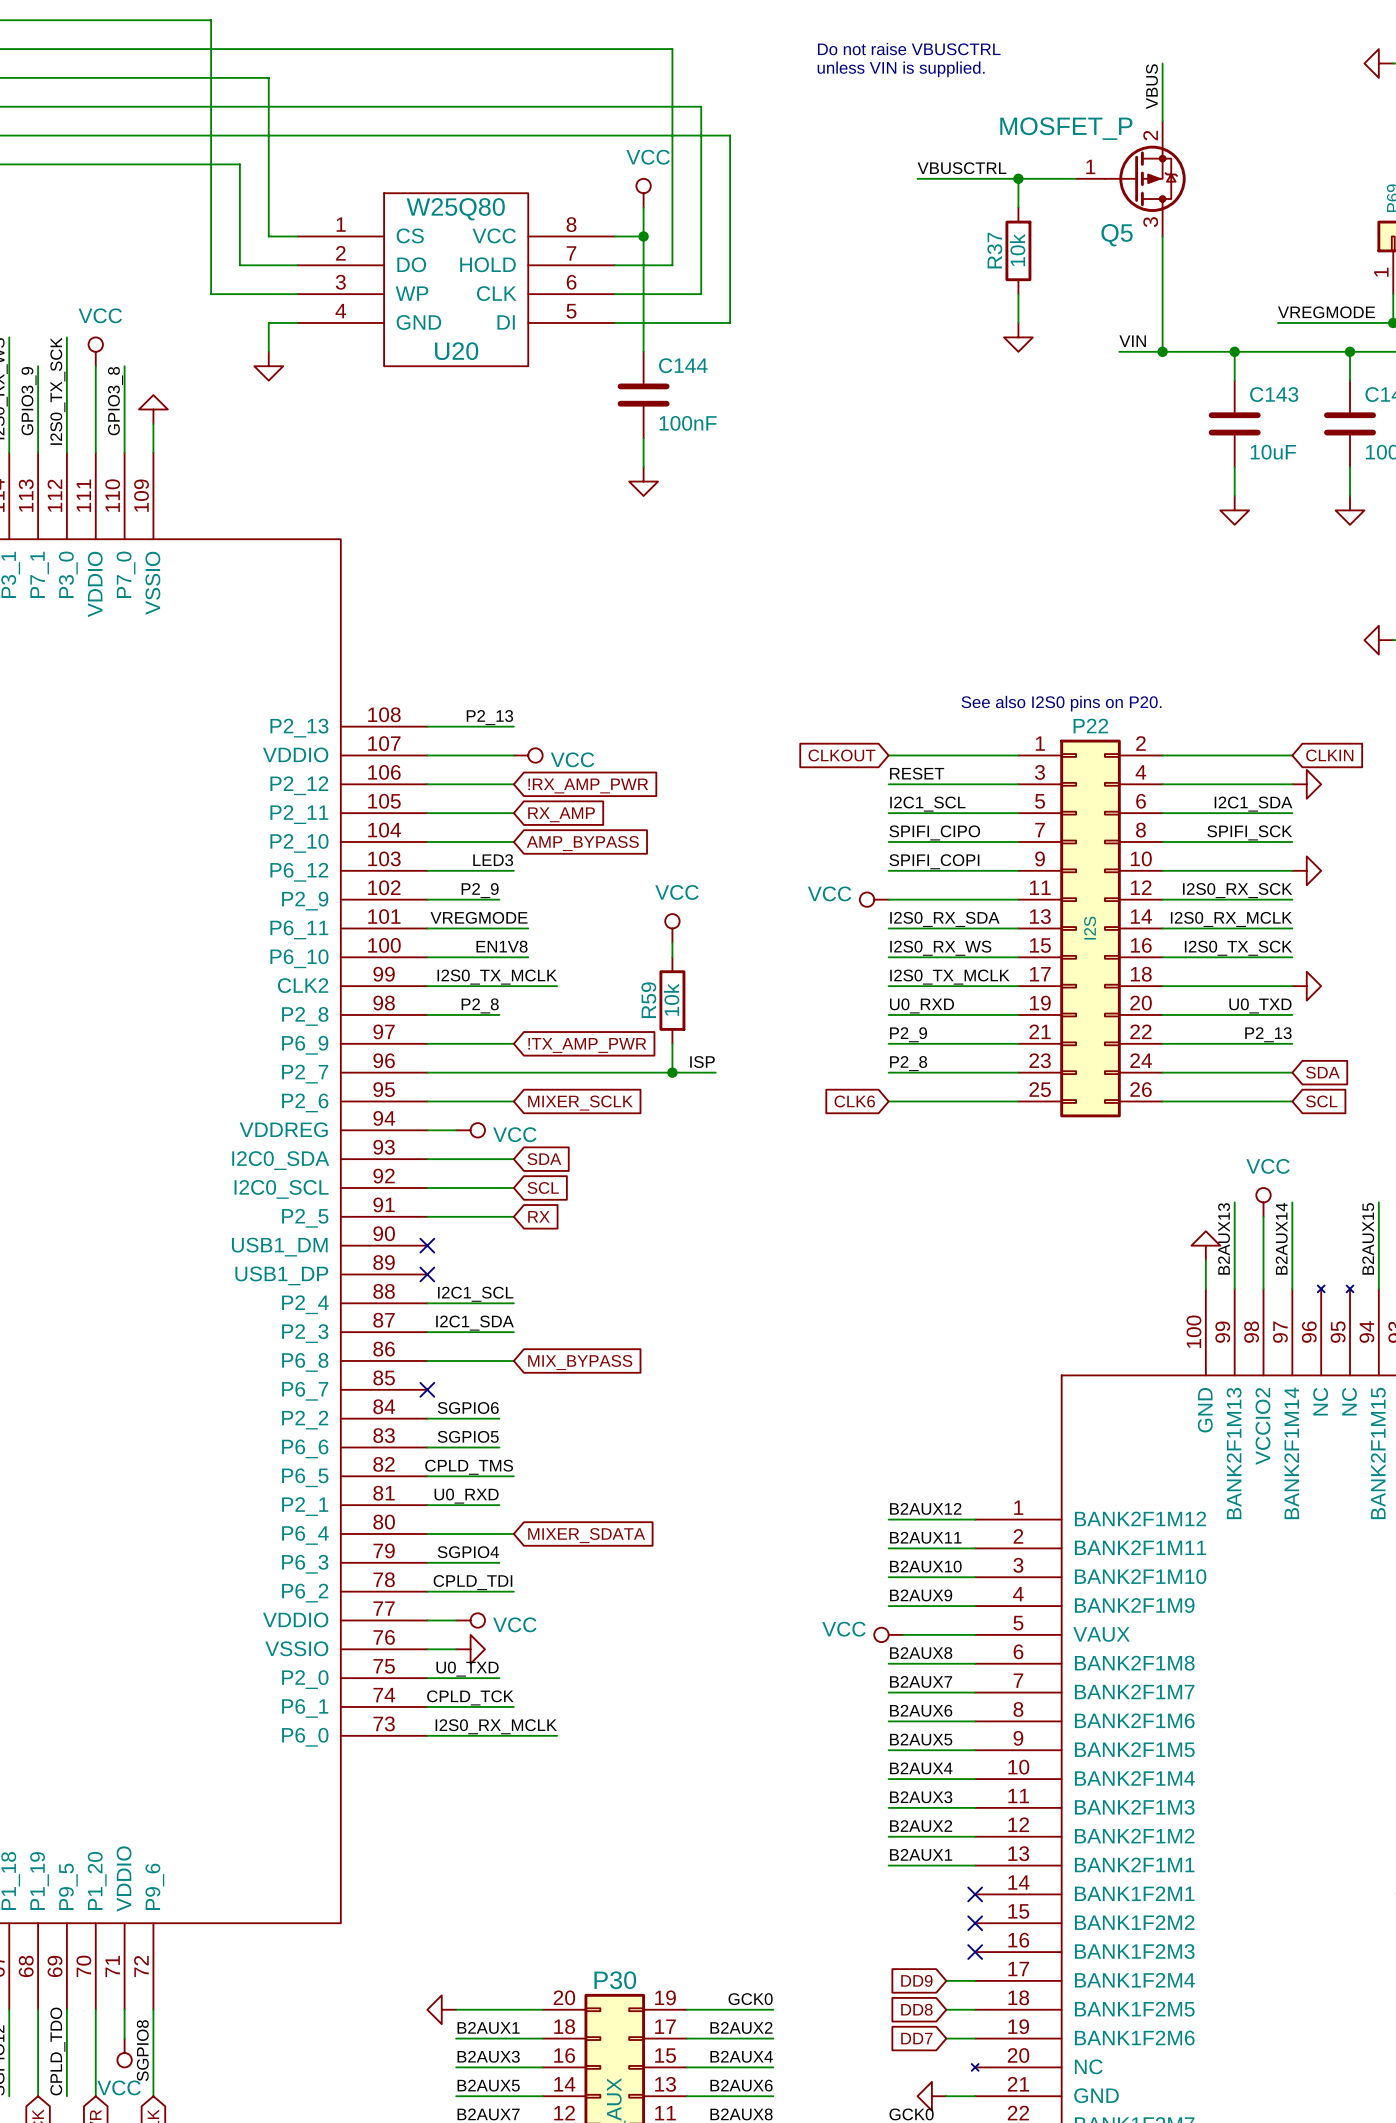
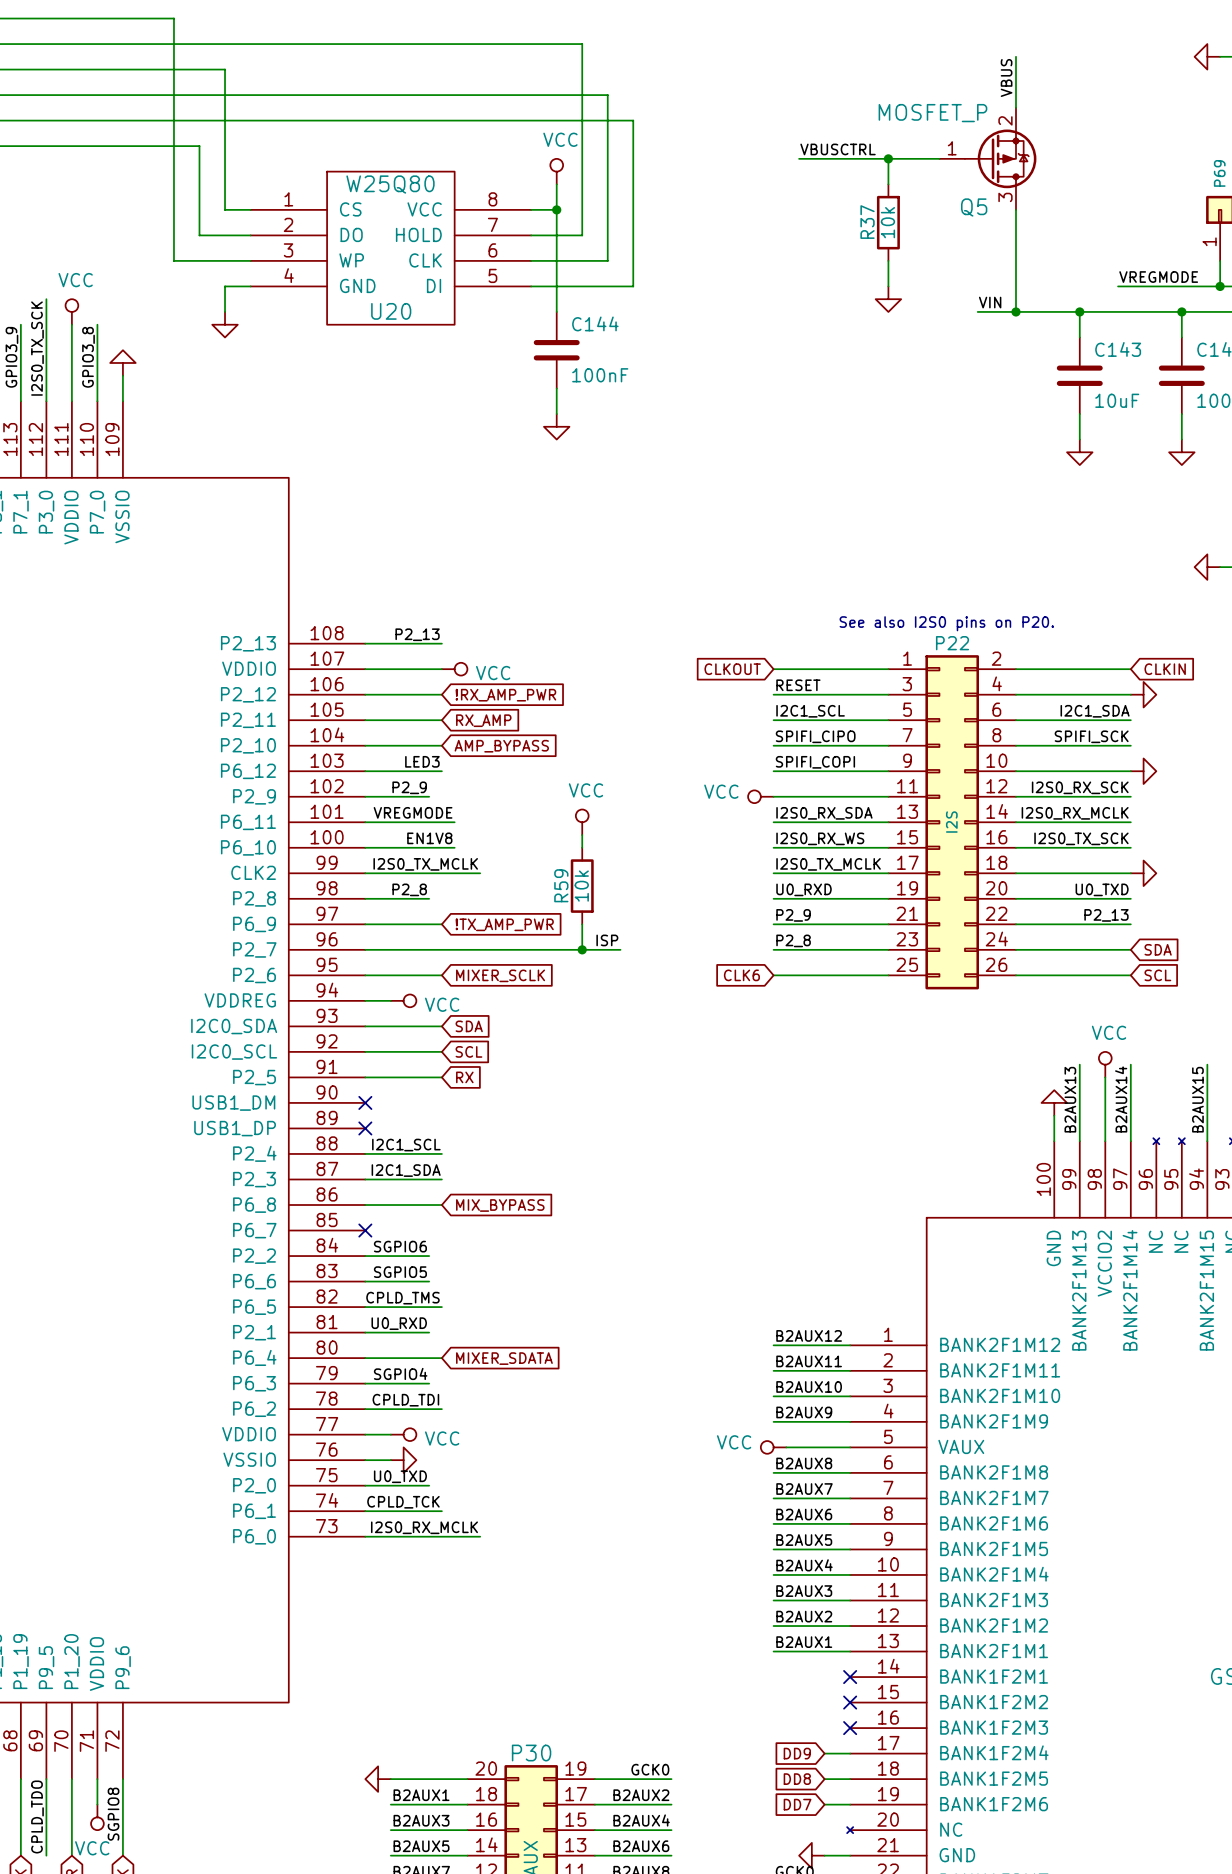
text: Do not raise VBUSCTRL (909, 49) -> none
text: unless VIN is supplied. (901, 69) -> none

